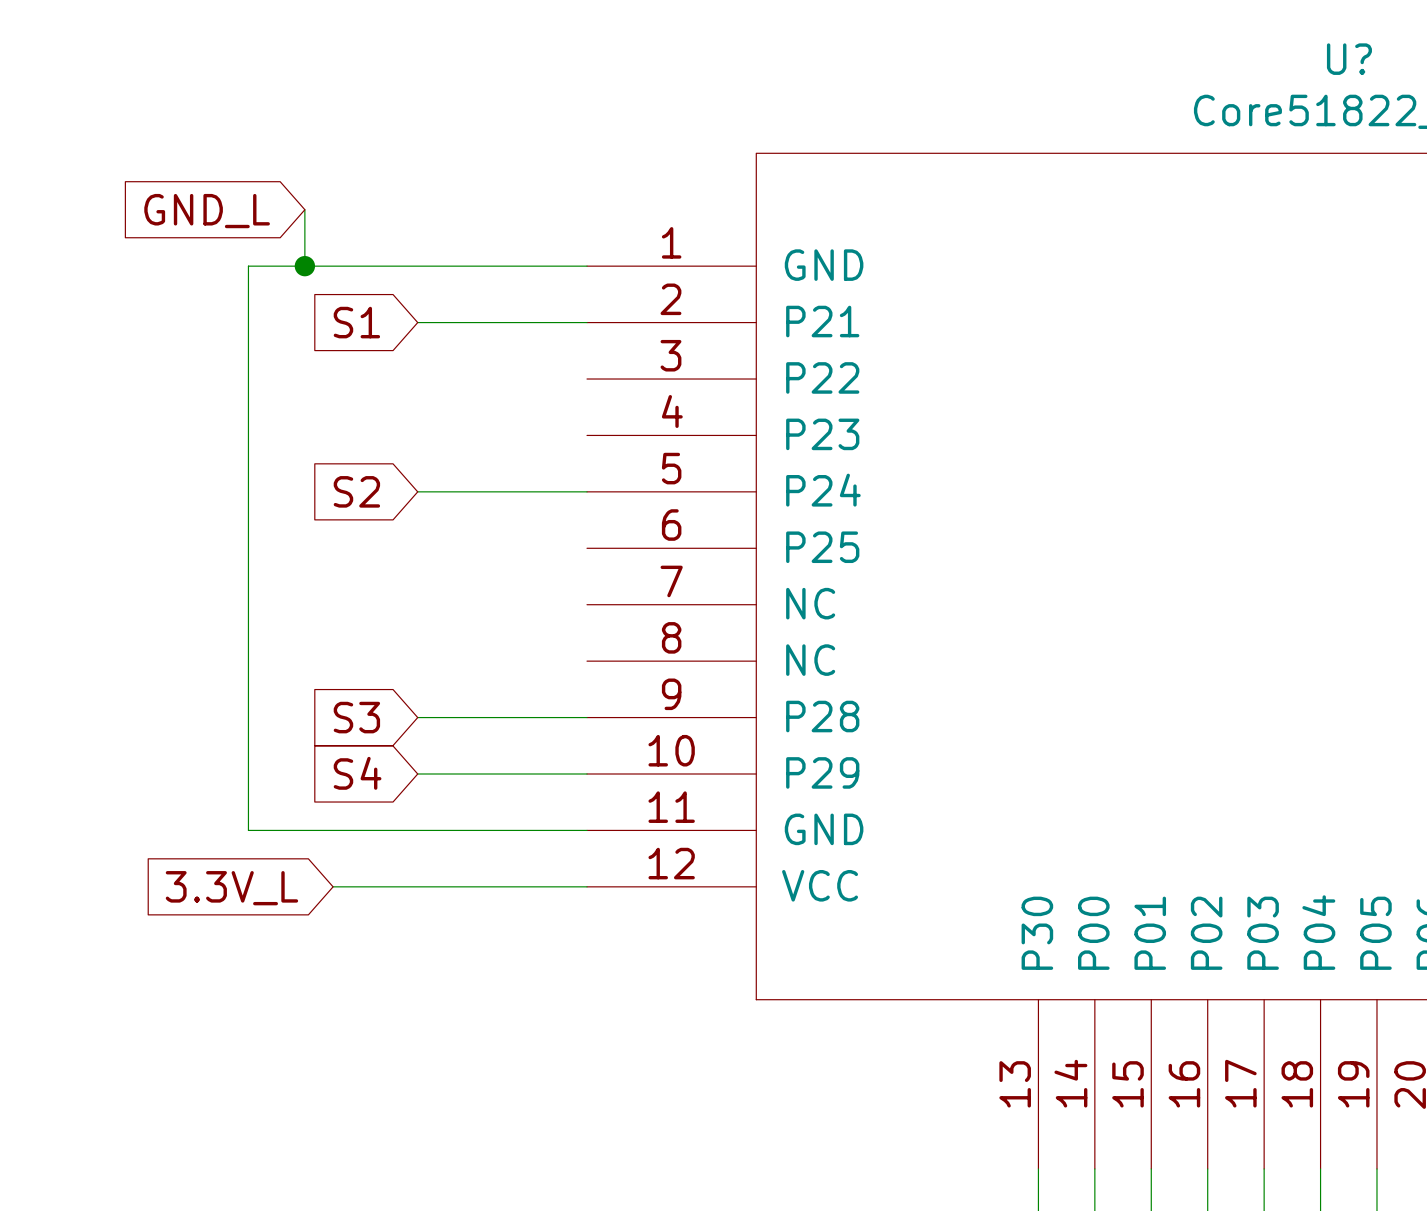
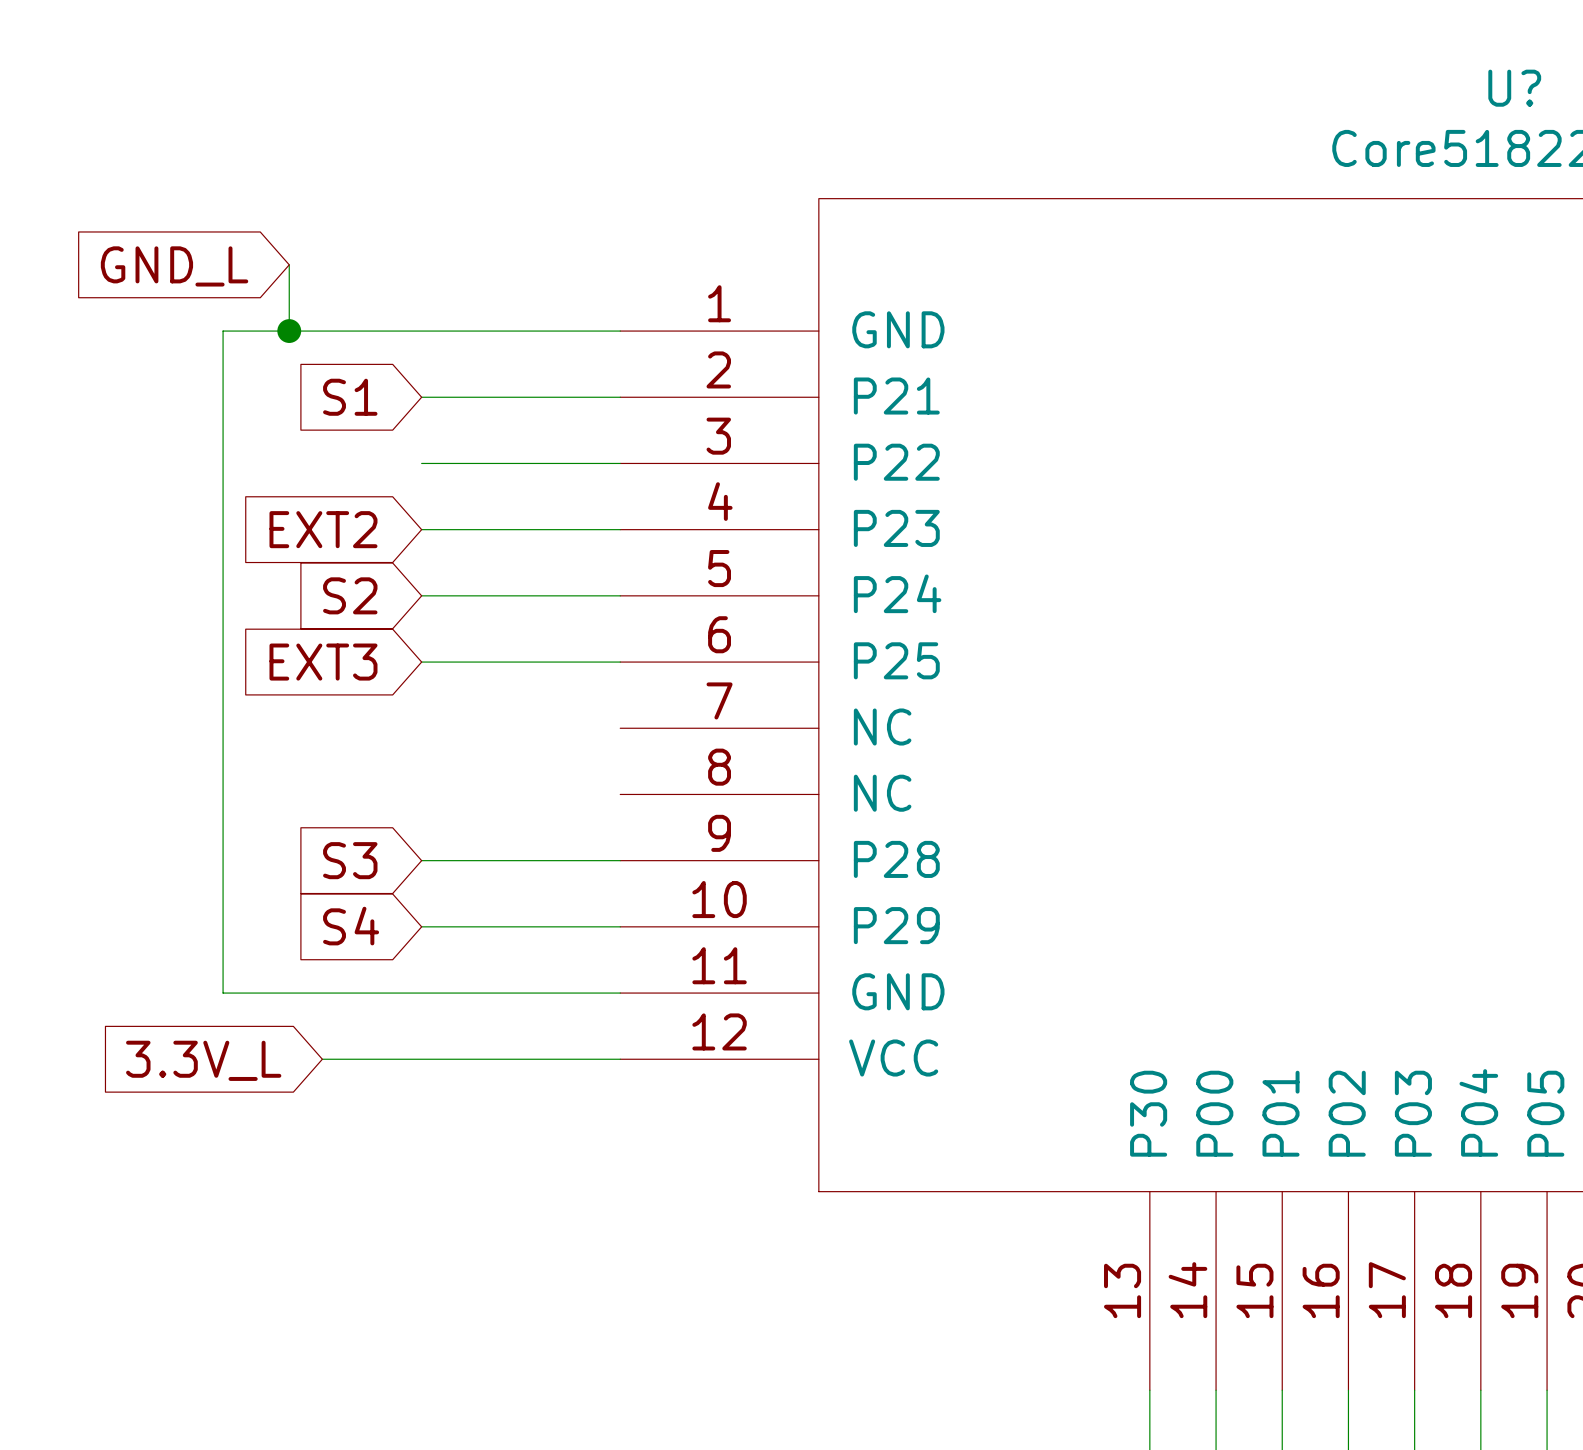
wire: none -> (421, 463) (620, 463)
global label: none -> EXT2 (323, 529)
wire: none -> (421, 529) (620, 529)
global label: none -> EXT3 (323, 662)
wire: none -> (421, 662) (620, 662)

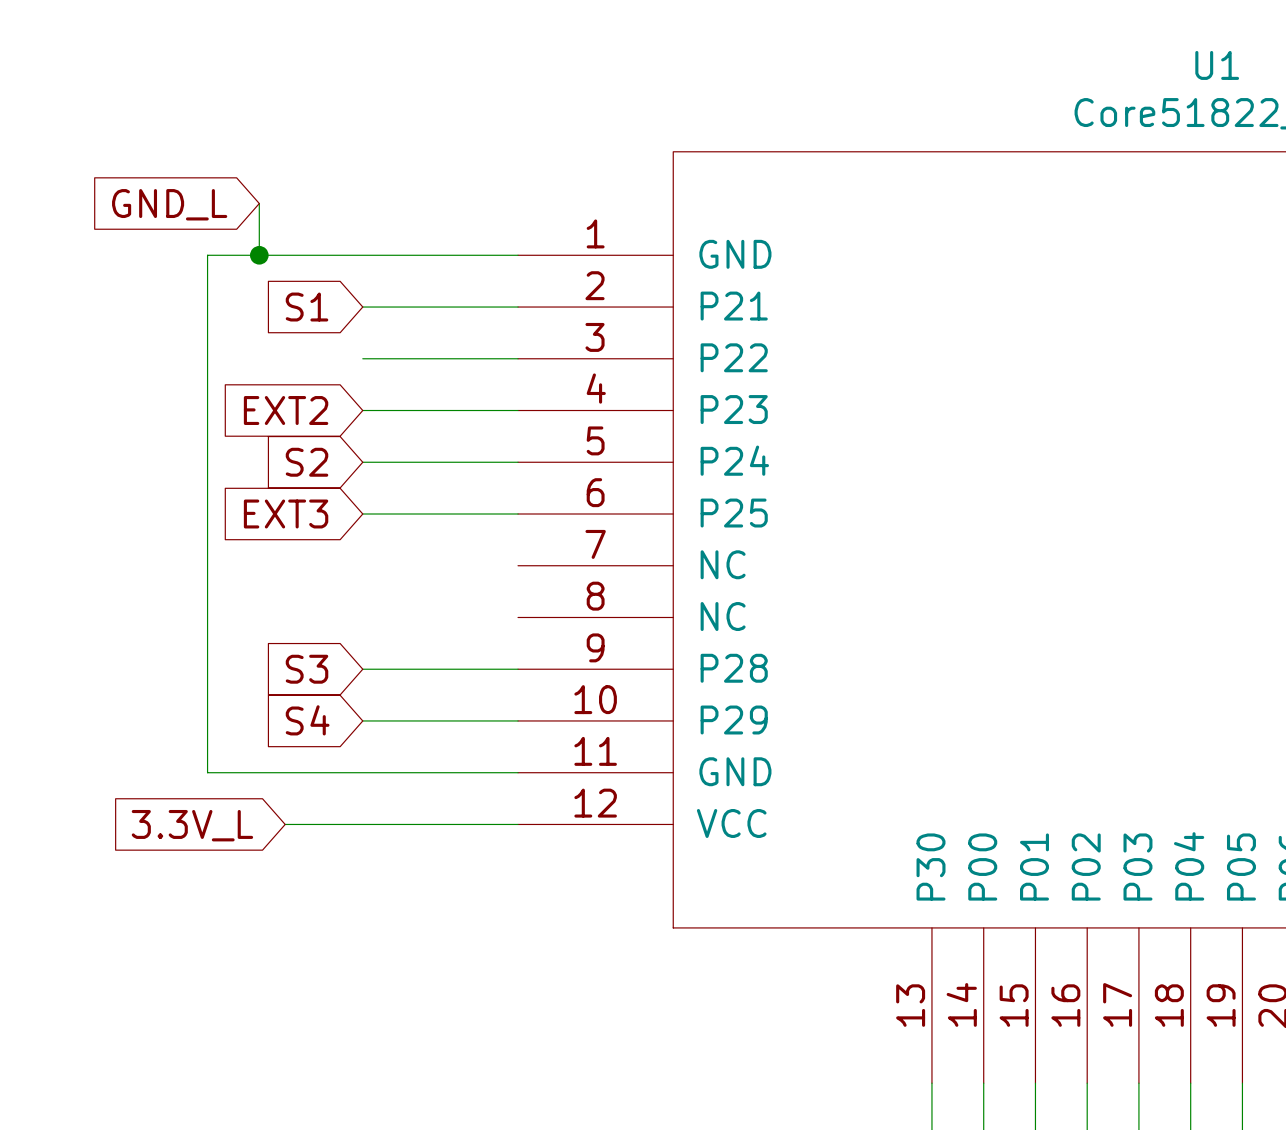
U? name: U? (1514, 88) -> U1 (1217, 65)

